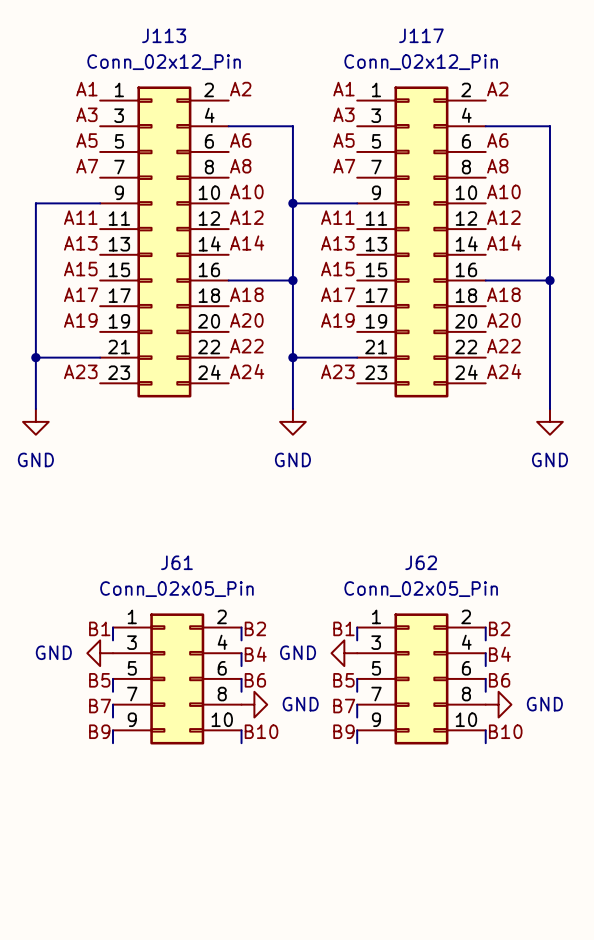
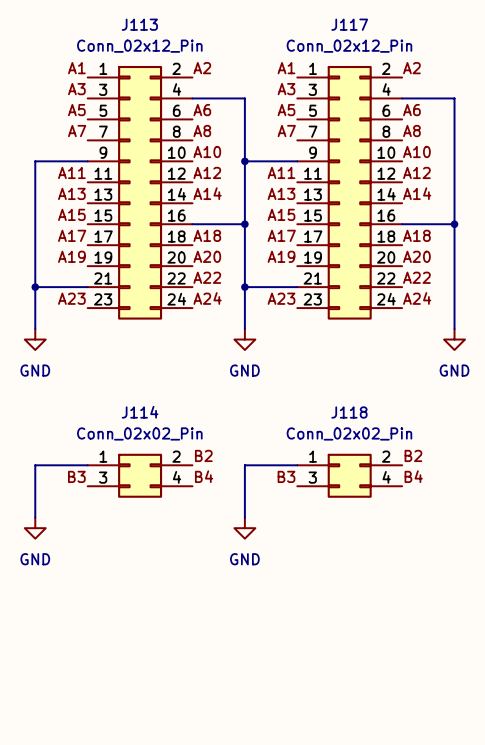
wire: none -> (87, 465) (35, 465) (35, 517)
wire: none -> (297, 465) (244, 465) (244, 517)
J114: none -> Conn_02x02_Pin (140, 475)
J118: none -> Conn_02x02_Pin (349, 475)
label: none -> B3 (76, 476)
label: none -> B3 (286, 476)
wire: (113, 627) (113, 640) -> none
wire: (241, 627) (241, 640) -> none
wire: (357, 627) (357, 640) -> none
wire: (485, 627) (485, 640) -> none
label: B1 (99, 628) -> none
label position: B2 (255, 628) -> B2 (203, 455)
label: B1 (343, 628) -> none
label position: B2 (499, 628) -> B2 (413, 455)
power symbol rotation: 0° (100, 653) -> 90° counterclockwise (35, 528)
power symbol position: GND (100, 653) -> GND (35, 528)
wire: (241, 653) (241, 666) -> none
power symbol: none -> GND (244, 528)
power symbol: GND (344, 653) -> none
wire: (485, 653) (485, 666) -> none
label position: B4 (255, 654) -> B4 (204, 476)
label position: B4 (499, 654) -> B4 (413, 476)
wire: (113, 678) (113, 691) -> none
J61: Conn_02x05_Pin (177, 678) -> none
wire: (241, 678) (241, 691) -> none
wire: (357, 678) (357, 691) -> none
J62: Conn_02x05_Pin (421, 678) -> none
wire: (485, 678) (485, 691) -> none
label: B5 (99, 680) -> none
label: B6 (255, 680) -> none
label: B5 (343, 680) -> none
label: B6 (499, 680) -> none
wire: (113, 704) (113, 717) -> none
power symbol: GND (254, 704) -> none
wire: (357, 704) (357, 717) -> none
power symbol: GND (498, 704) -> none
label: B7 (100, 706) -> none
label: B7 (344, 706) -> none
wire: (113, 730) (113, 743) -> none
wire: (241, 730) (241, 743) -> none
wire: (357, 730) (357, 743) -> none
wire: (485, 730) (485, 743) -> none
label: B9 (99, 731) -> none
label: B10 (261, 731) -> none
label: B9 (343, 731) -> none
label: B10 (505, 731) -> none

